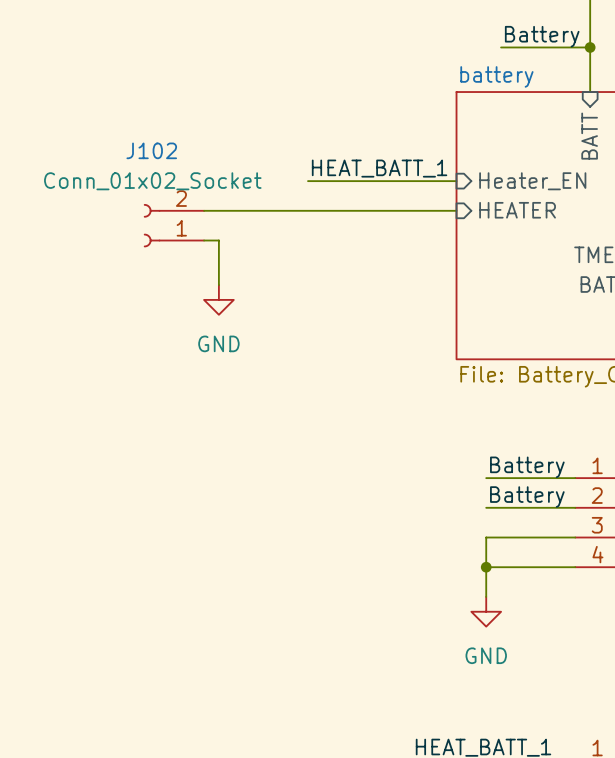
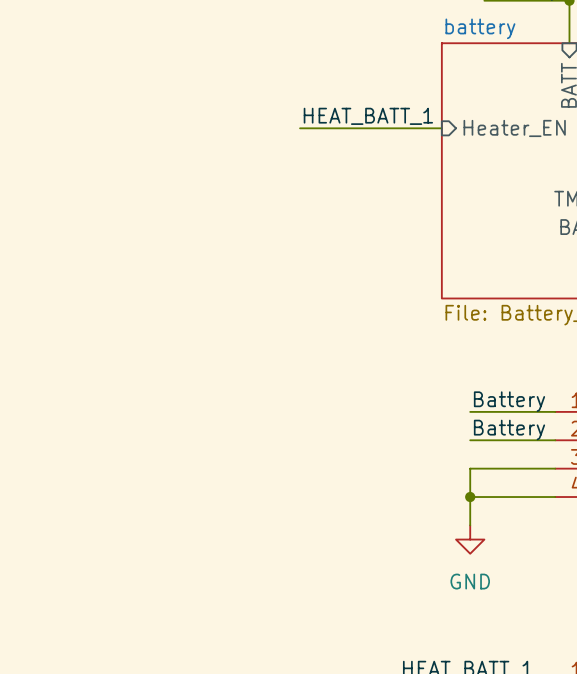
wire: (204, 210) (456, 210) -> none
sheet pin: HEATER (517, 210) -> none
J102: Conn_01x02_Socket (173, 225) -> none
wire: (204, 240) (218, 240) (218, 285) -> none
power symbol: GND (218, 299) -> none

